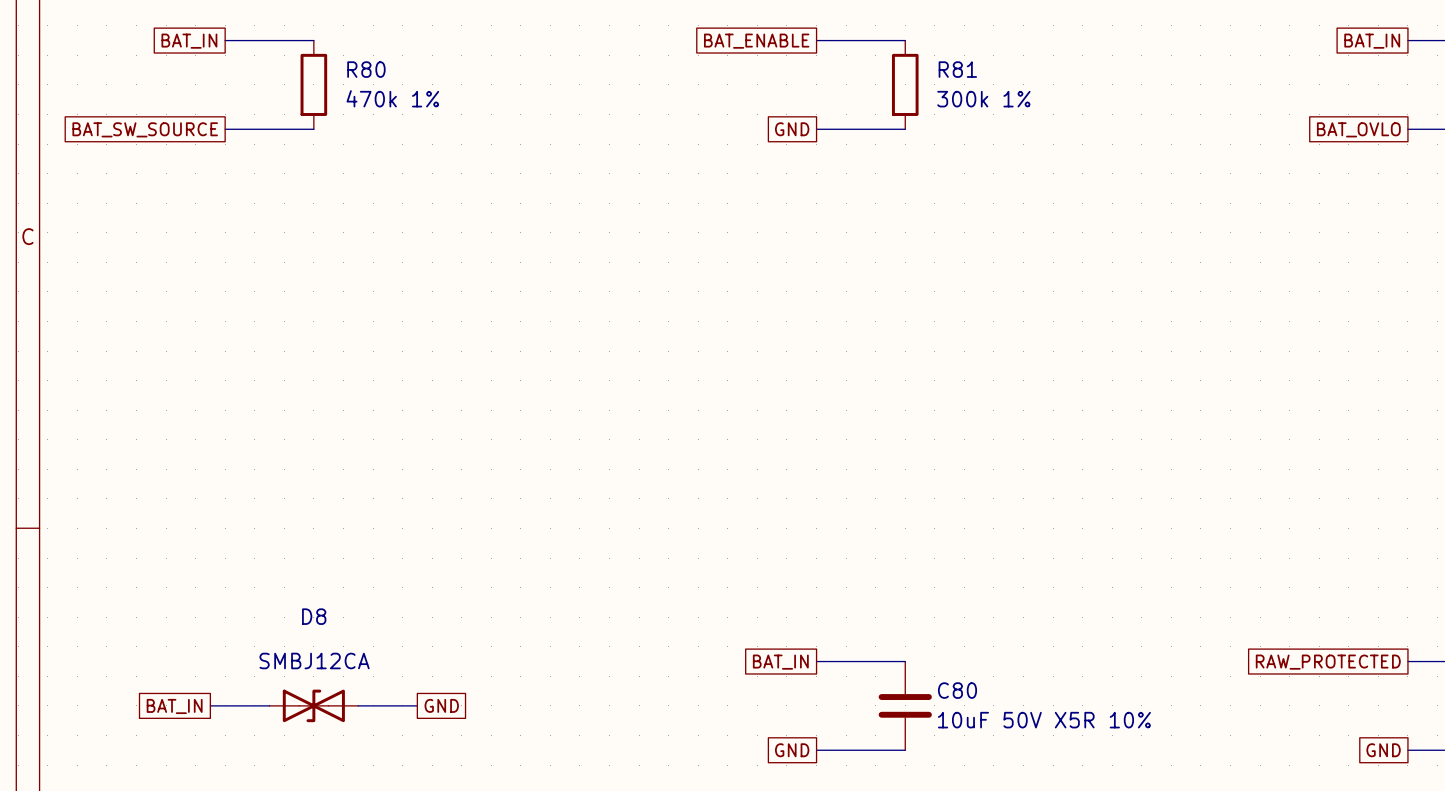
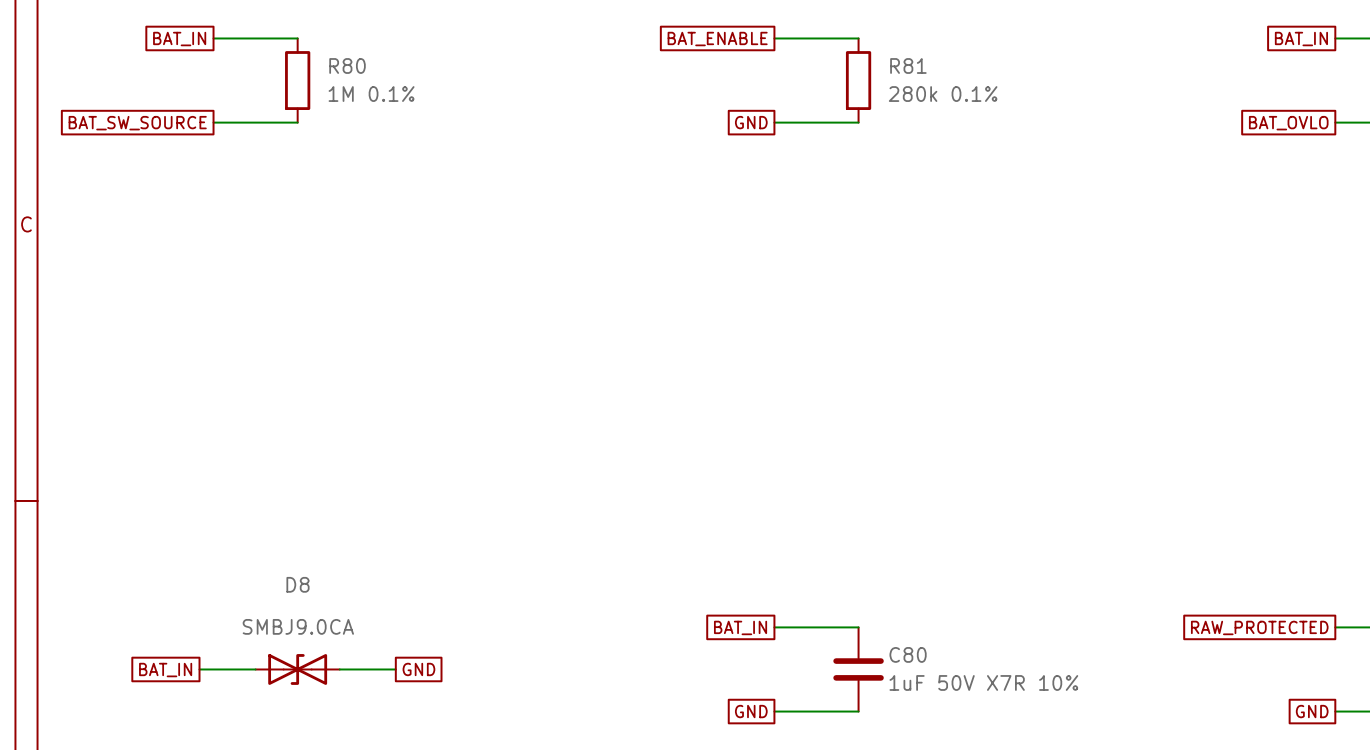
R80 value: 470k 1% (392, 98) -> 1M 0.1% (371, 94)
R81 value: 300k 1% (983, 99) -> 280k 0.1% (943, 94)
D8 value: SMBJ12CA (314, 660) -> SMBJ9.0CA (298, 626)
C80 value: 10uF 50V X5R 10% (1044, 720) -> 1uF 50V X7R 10% (983, 682)

